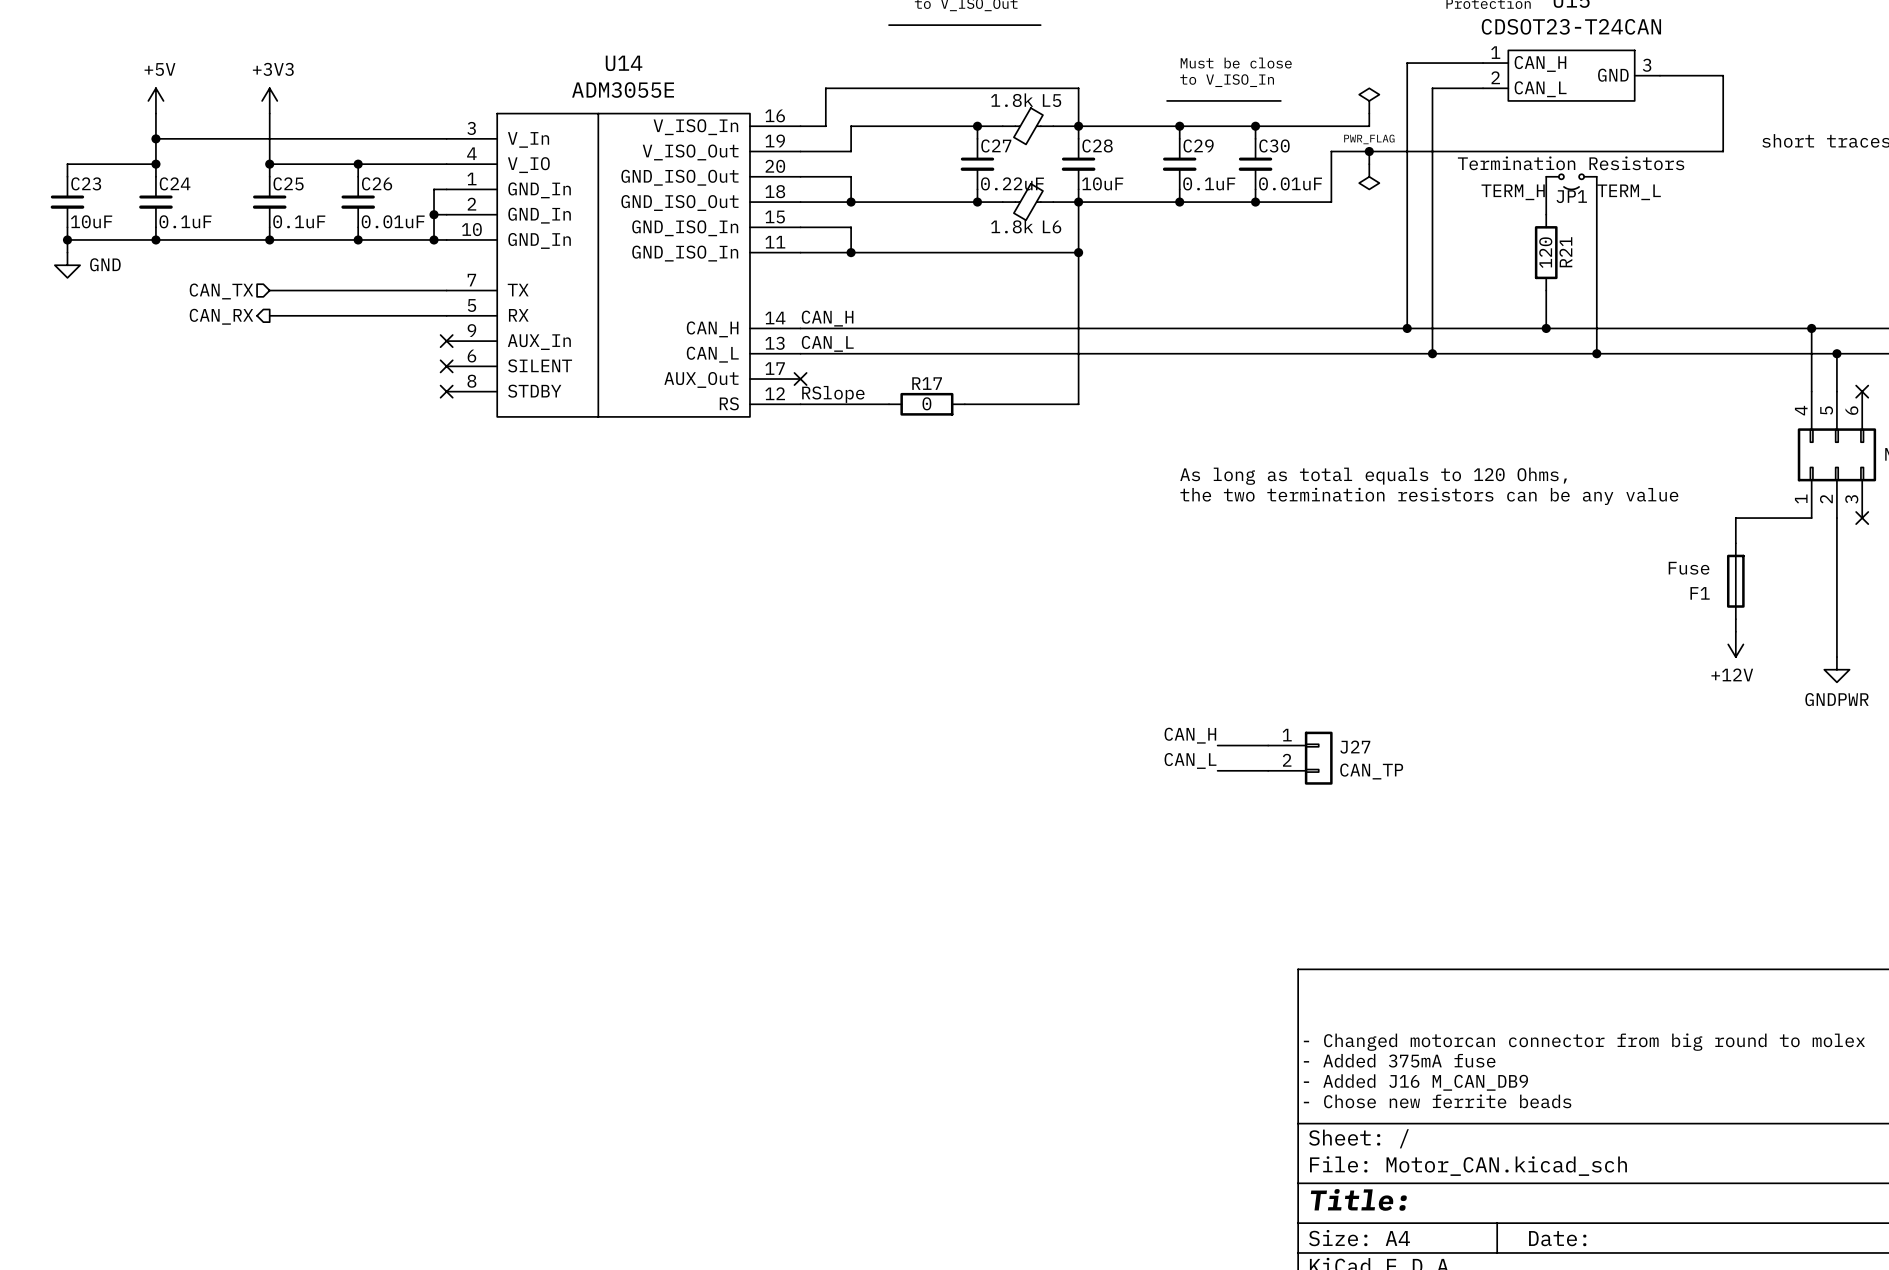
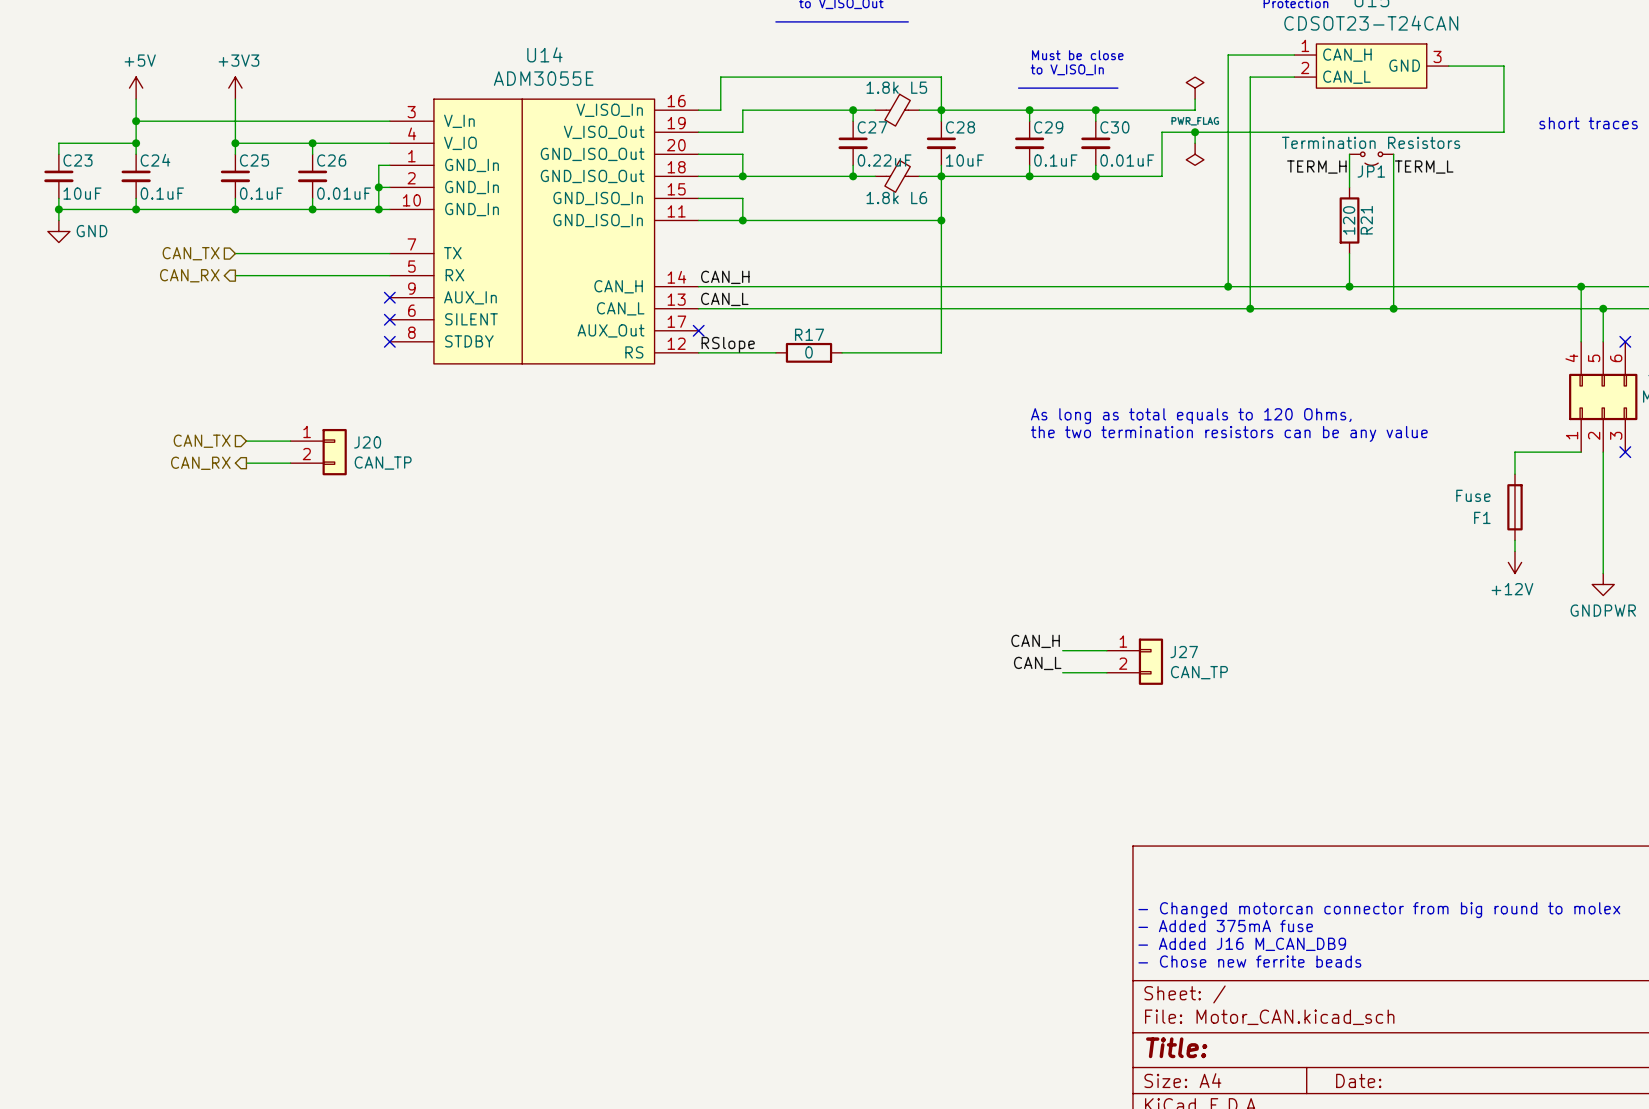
wire: none -> (246, 441) (290, 441)
hierarchical label: none -> CAN_TX (202, 441)
J20: none -> CAN_TP (318, 452)
wire: none -> (246, 463) (290, 463)
hierarchical label: none -> CAN_RX (200, 463)

